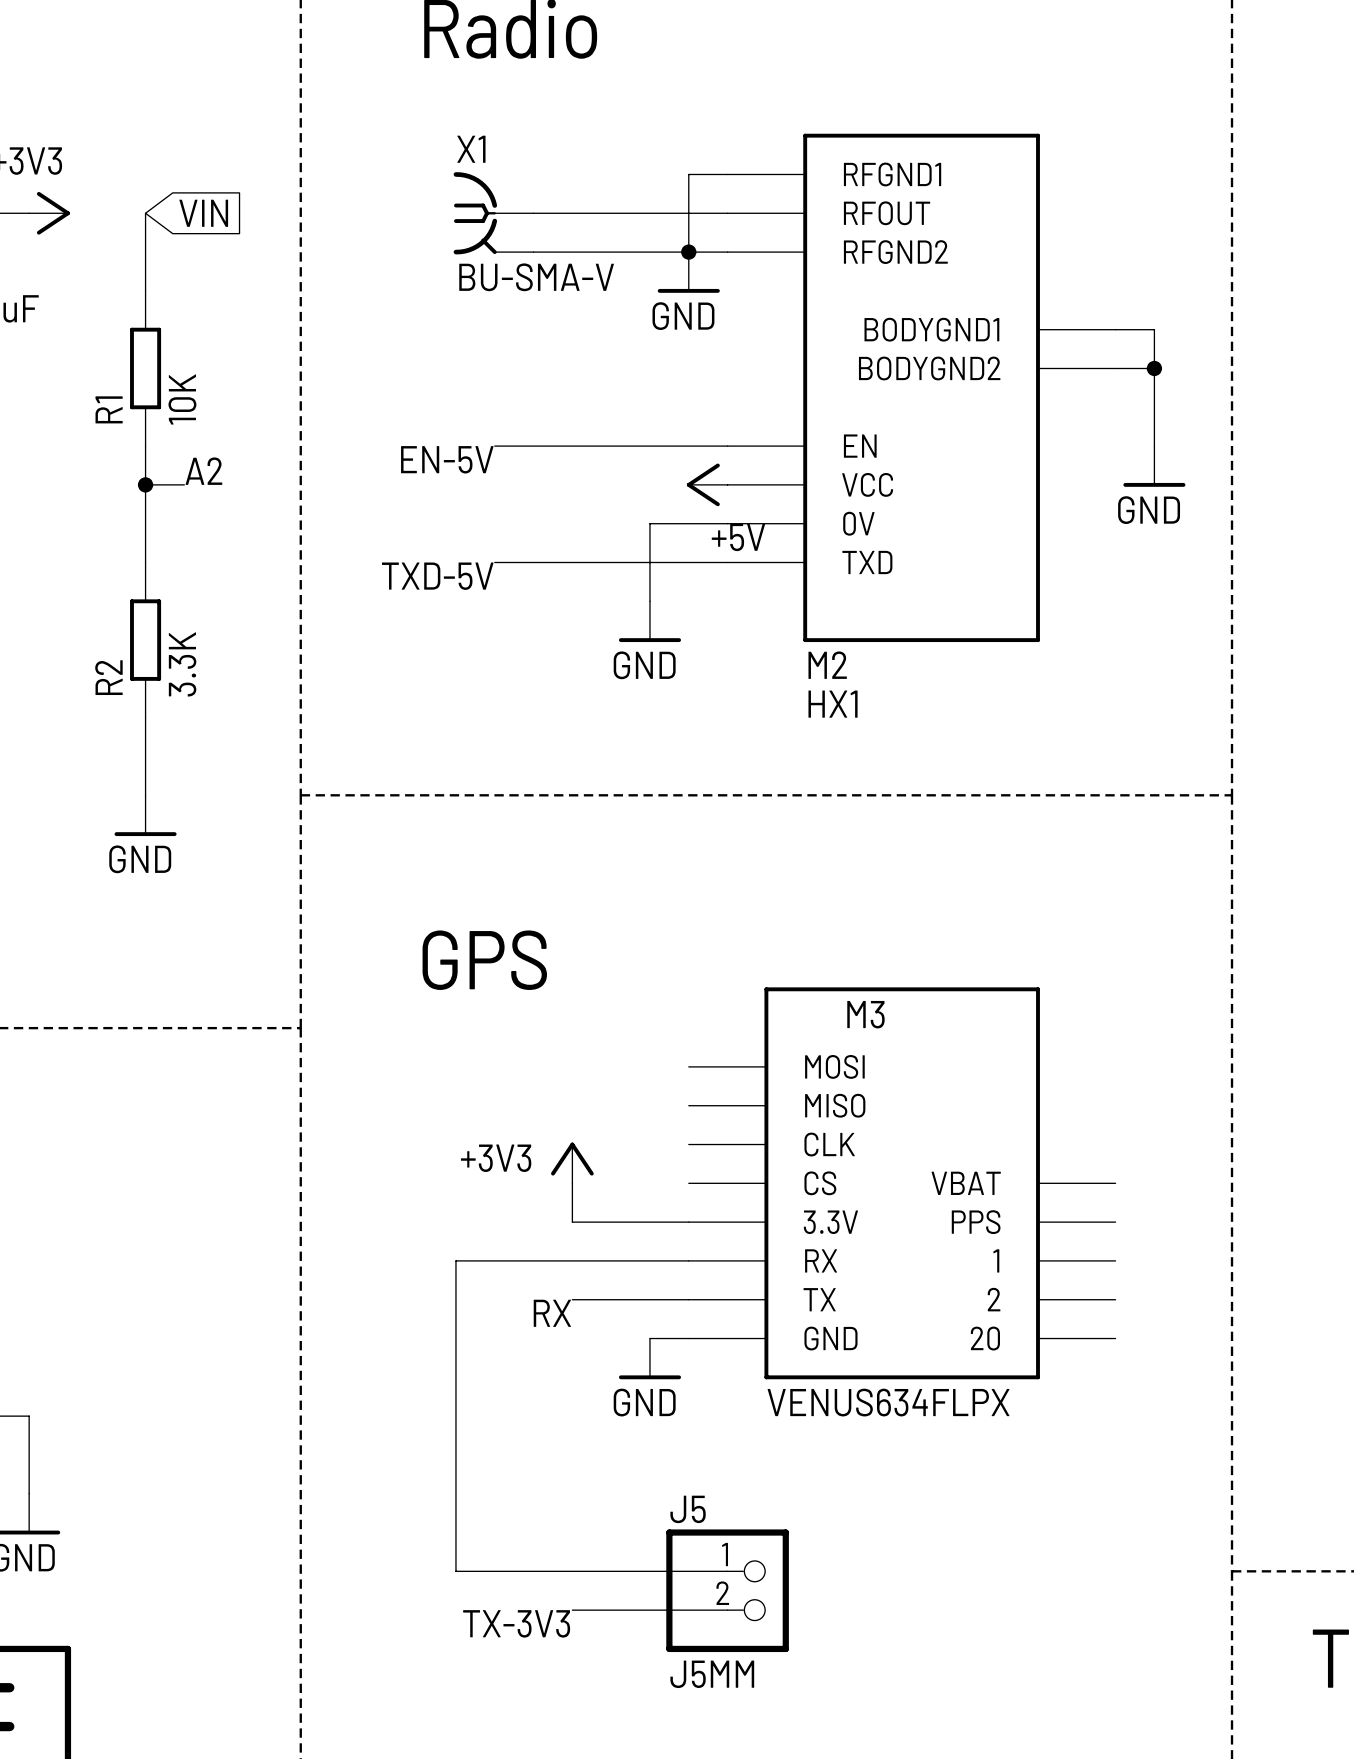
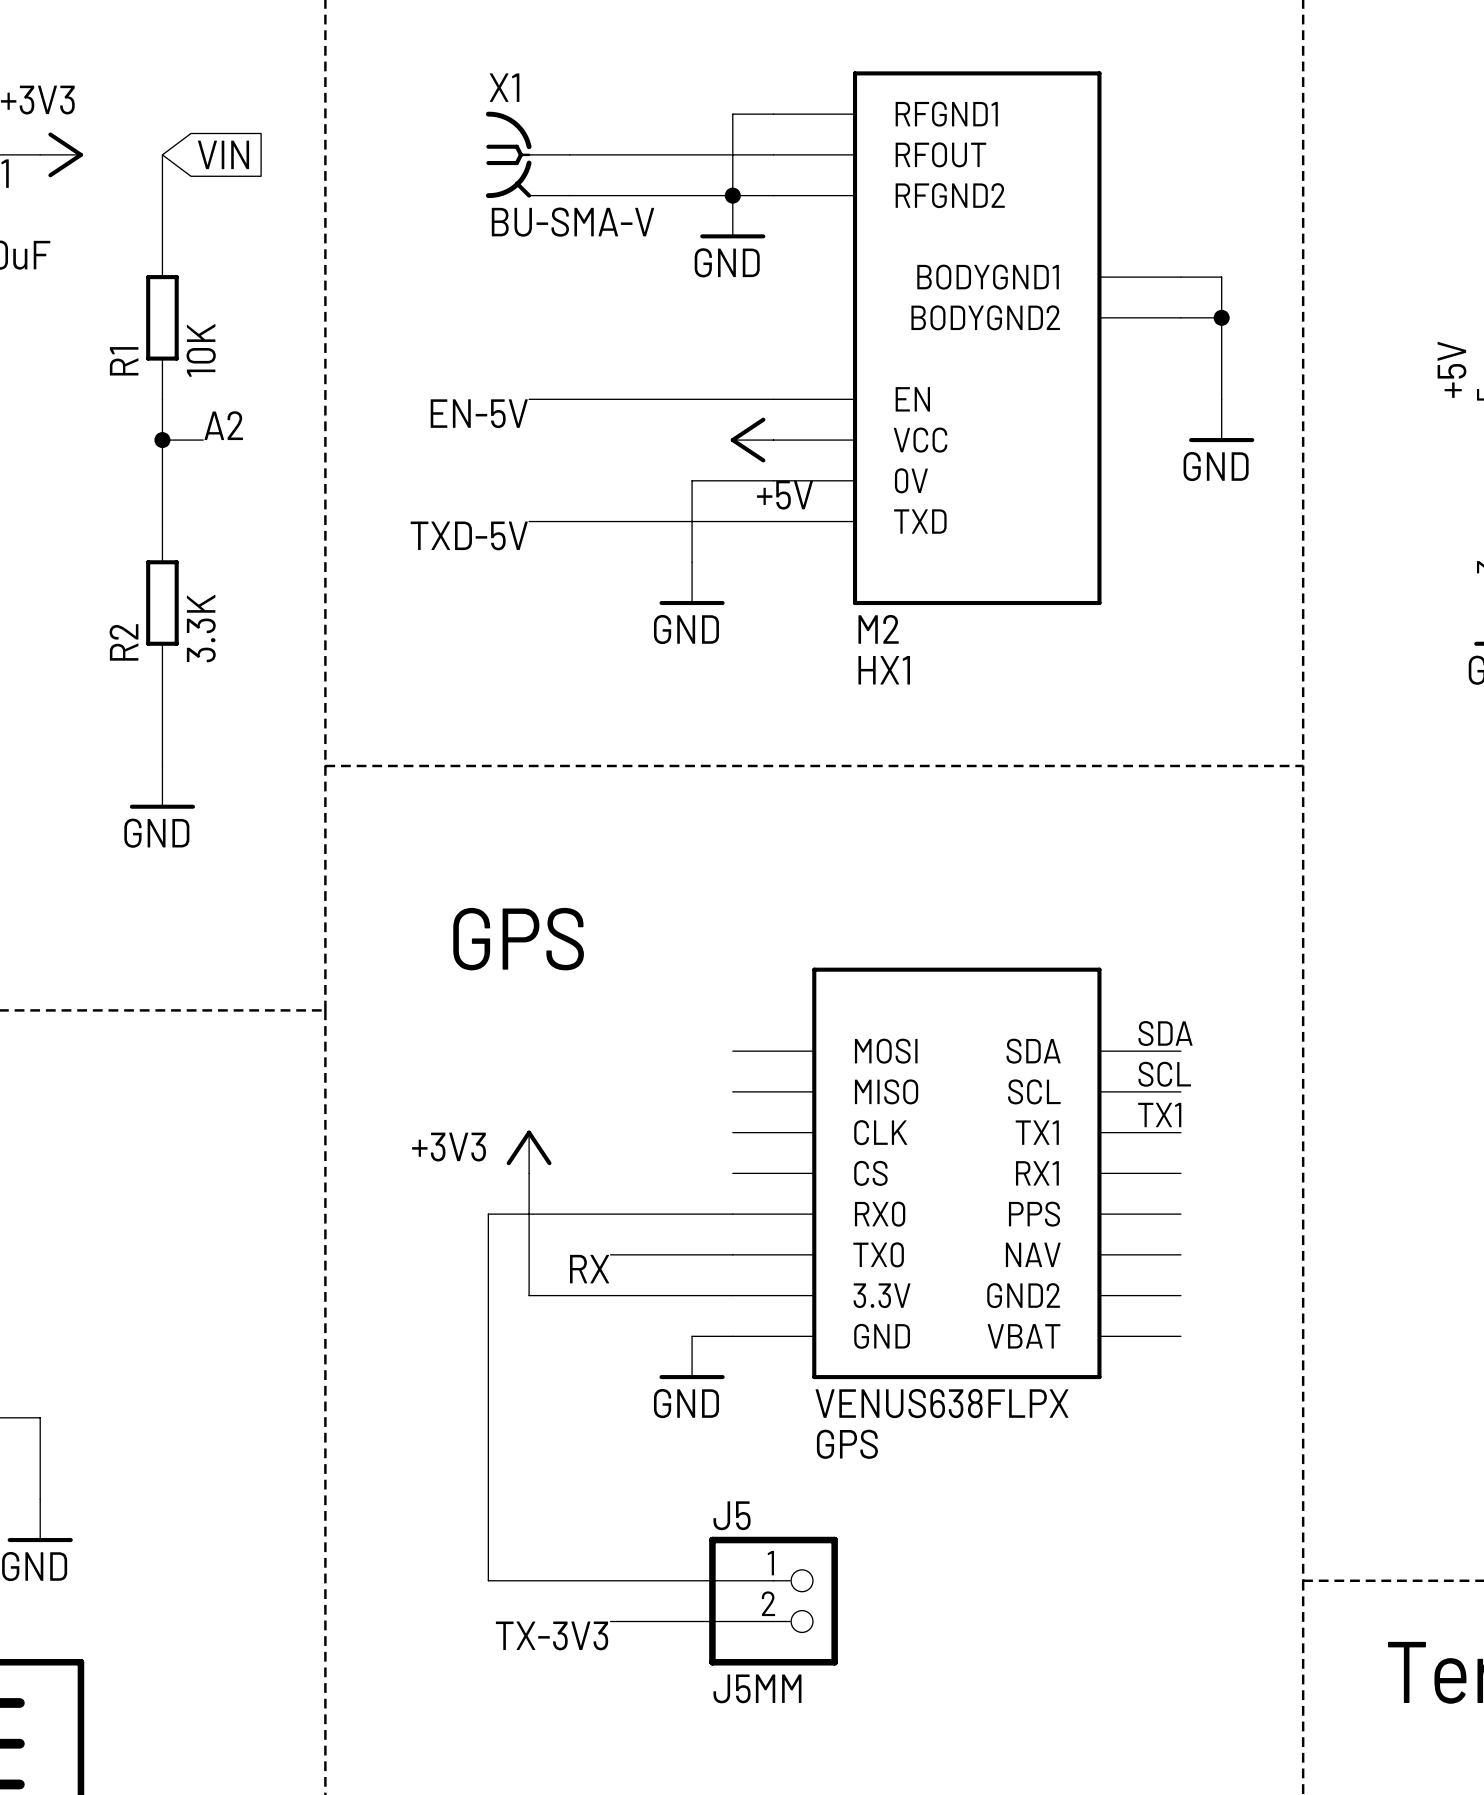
power symbol position: +3V3 (572, 1162) -> +3V3 (529, 1151)
wire: none -> (529, 1173) (529, 1295) (610, 1295)
wire: (572, 1183) (572, 1222) -> none
M3: VENUS634FLPX (902, 1183) -> none
GPS: none -> VENUS638FLPX (956, 1173)
wire: (455, 1260) (572, 1260) -> (488, 1254) (488, 1214) (610, 1214)
label position: RX (552, 1313) -> RX (589, 1269)

